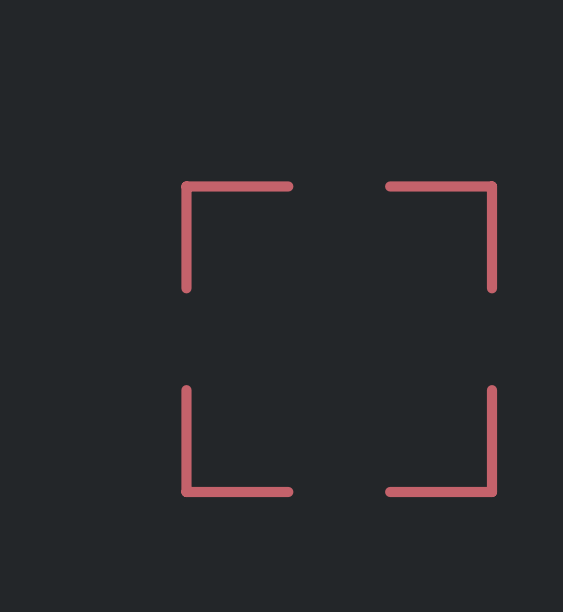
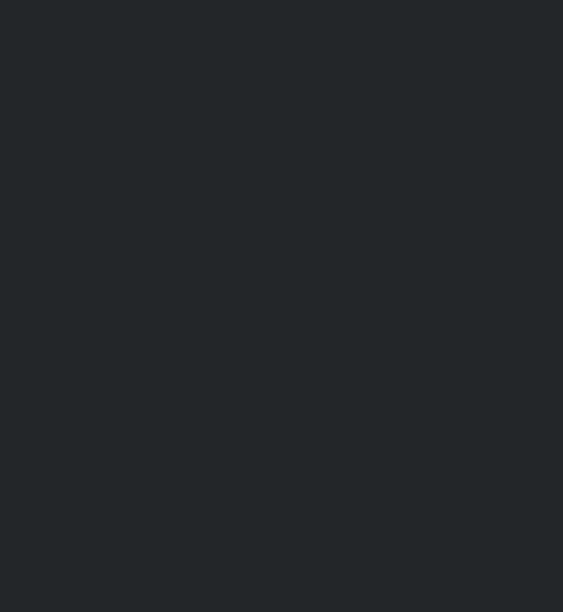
part: (237, 237) -> none
part: (441, 237) -> none
part: (237, 441) -> none
part: (441, 441) -> none

